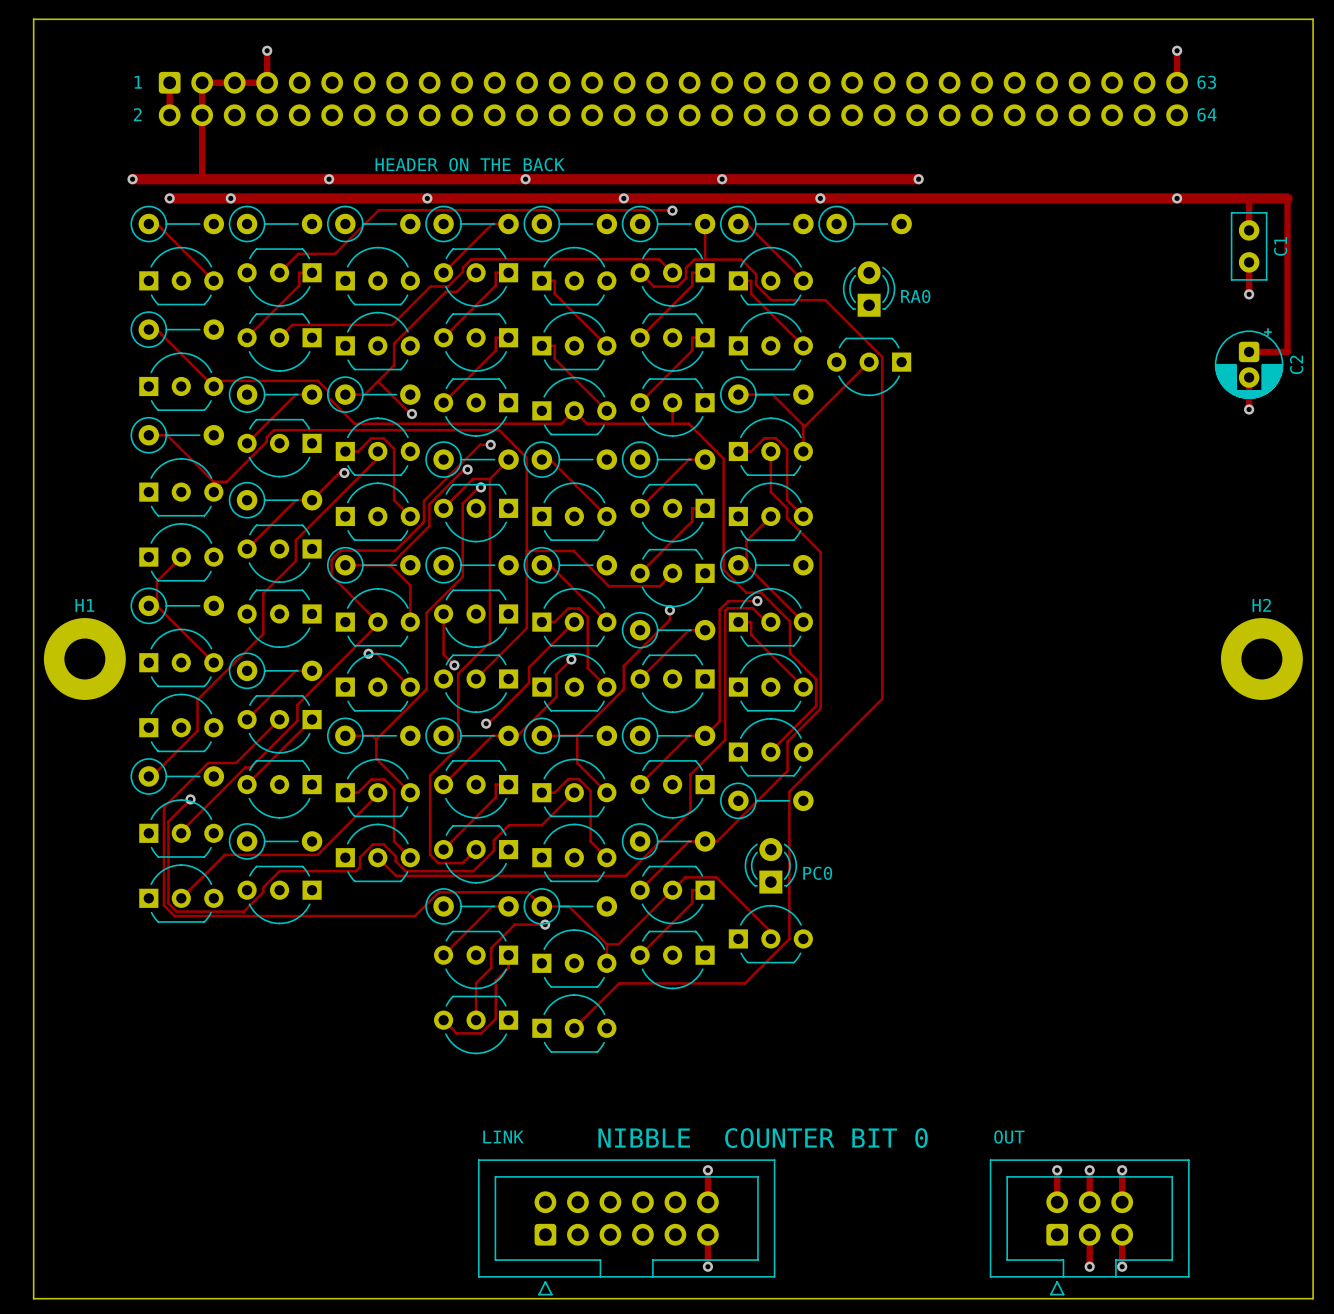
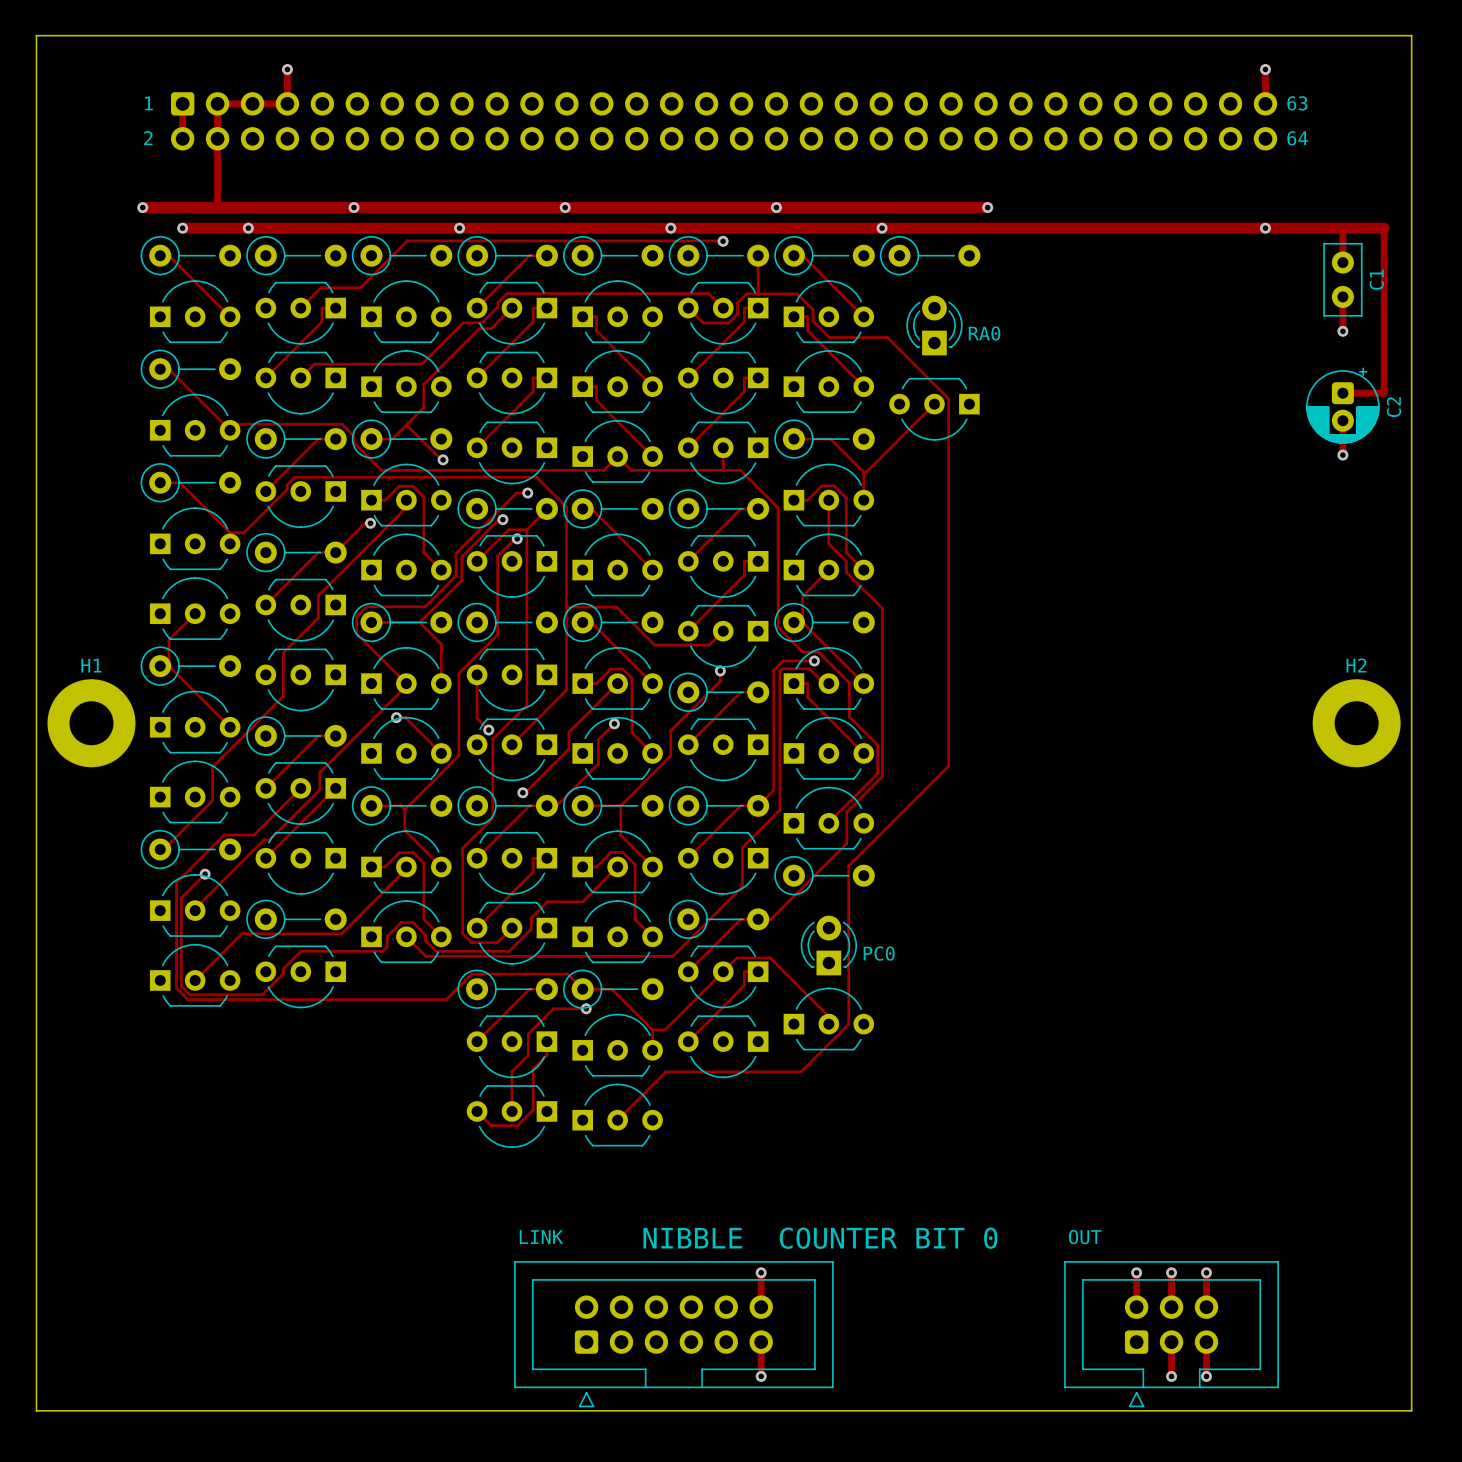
text: HEADER ON THE BACK (470, 164) -> none

